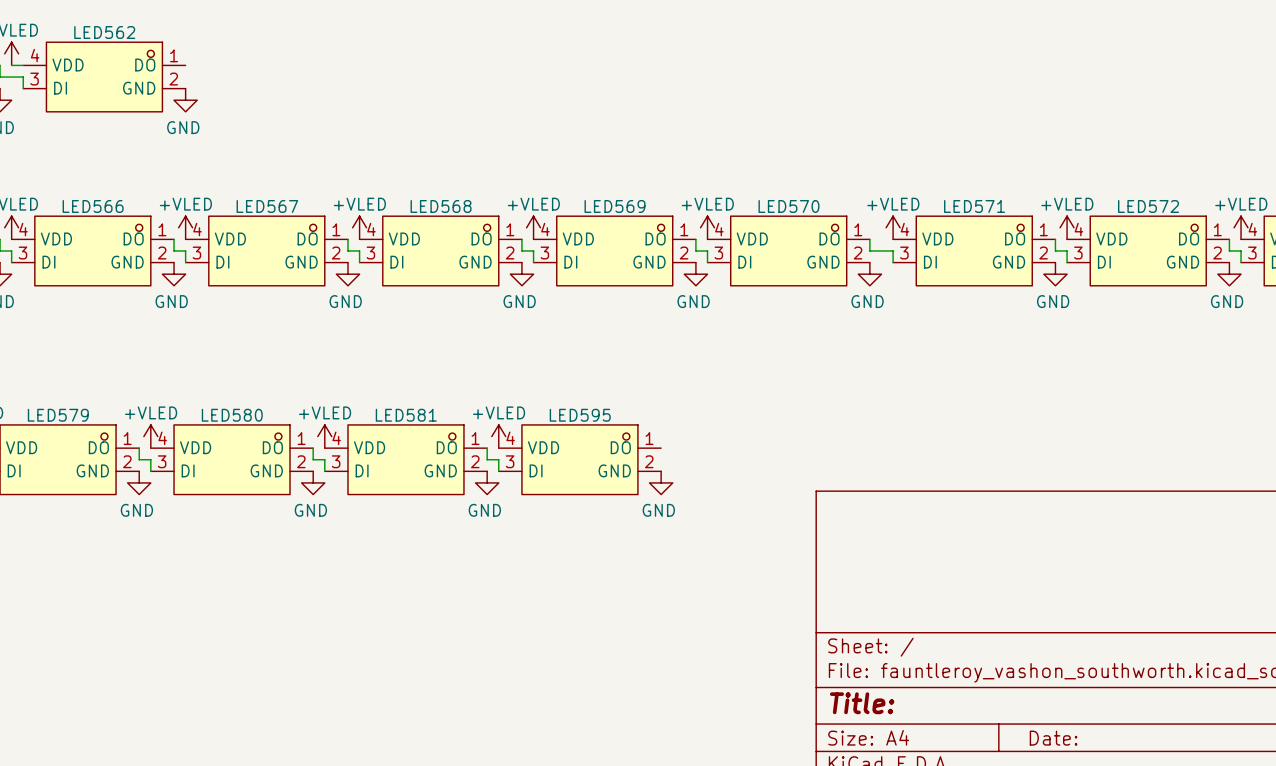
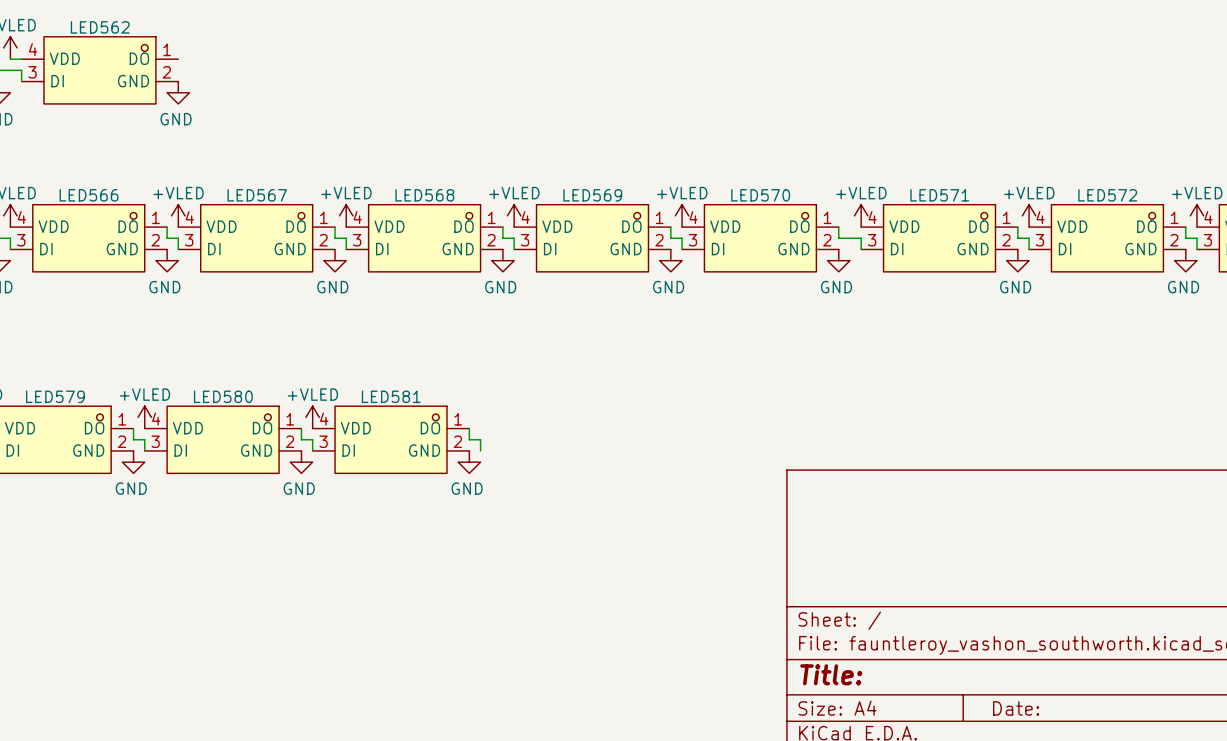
power symbol: +VLED (498, 436) -> none
LED595: (579, 459) -> none
power symbol: GND (661, 482) -> none

